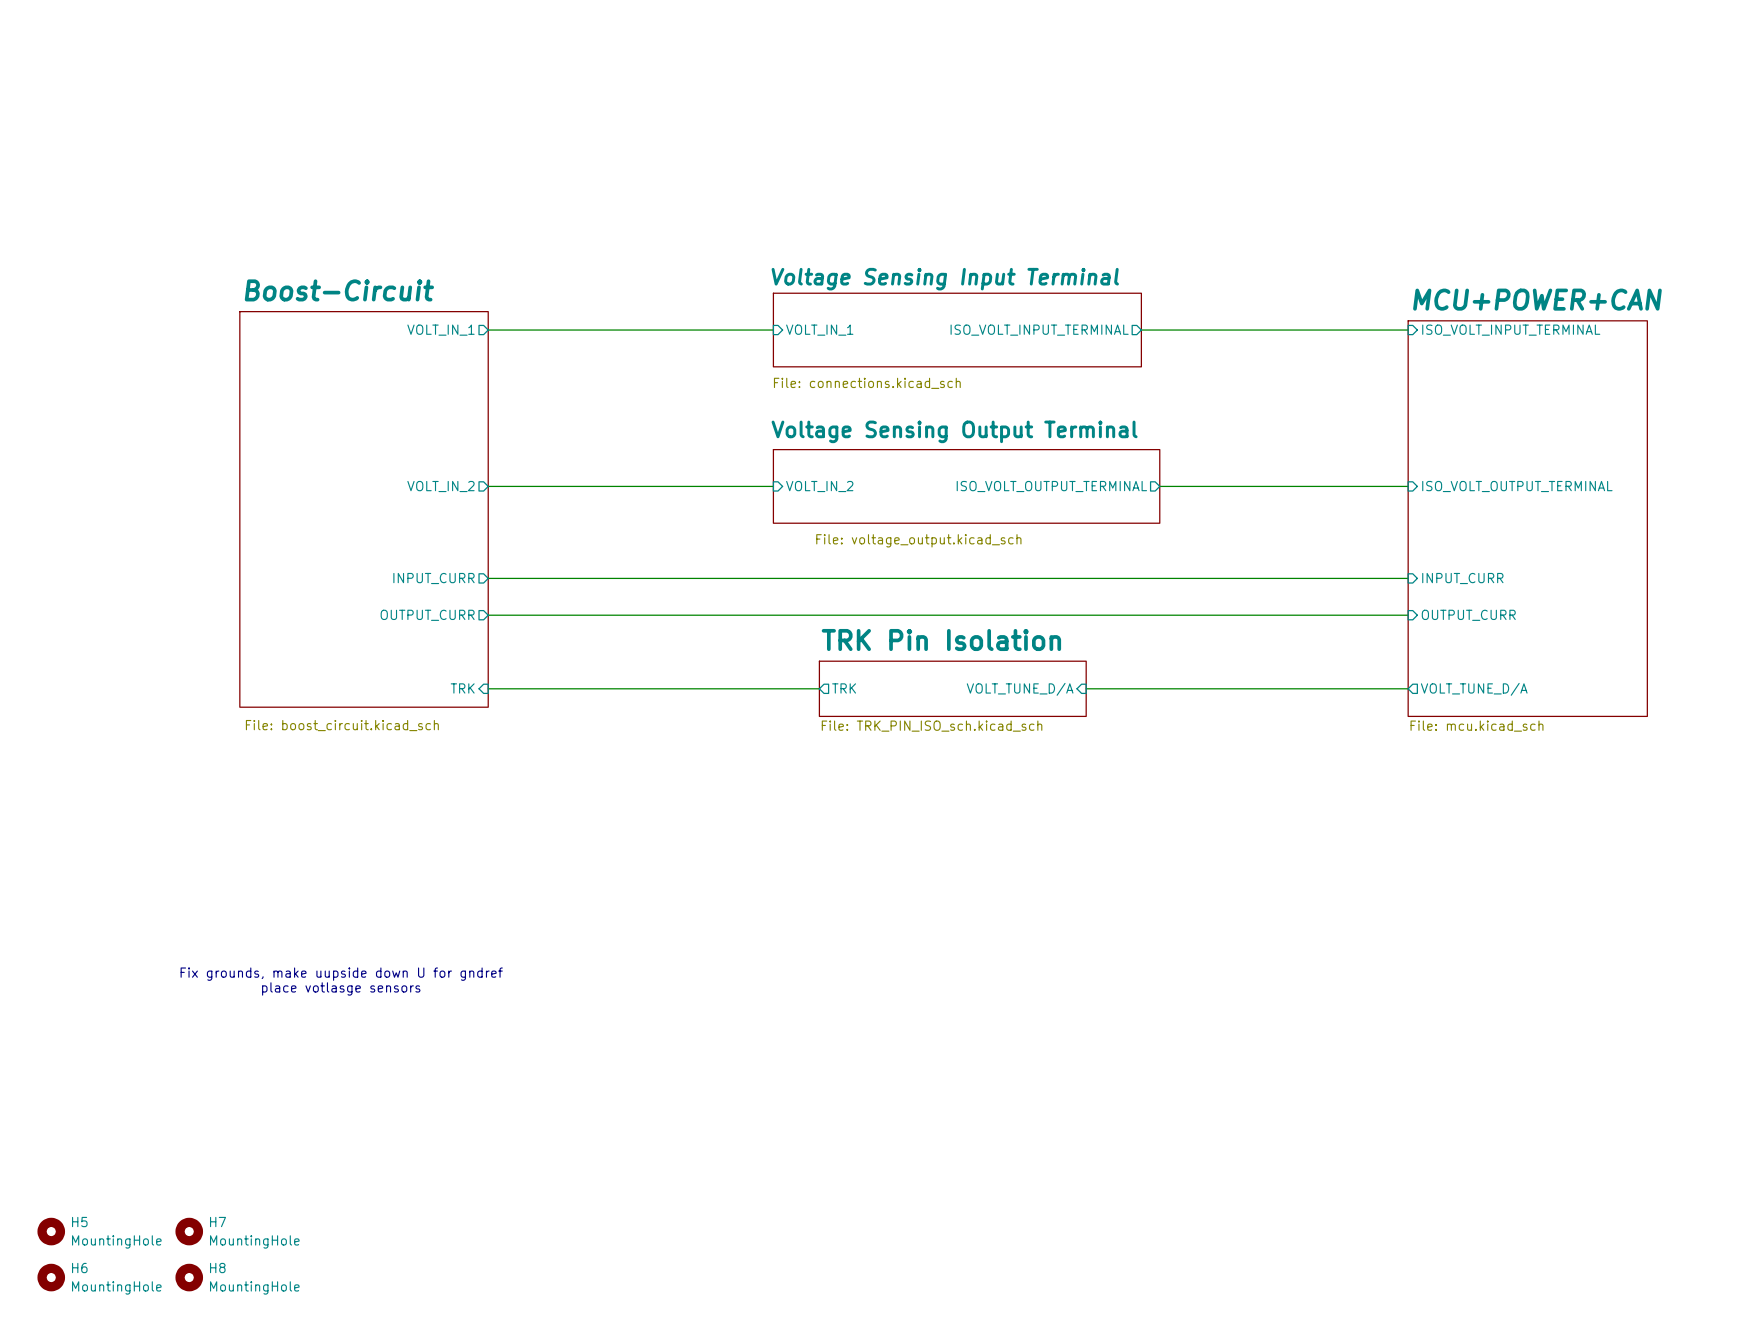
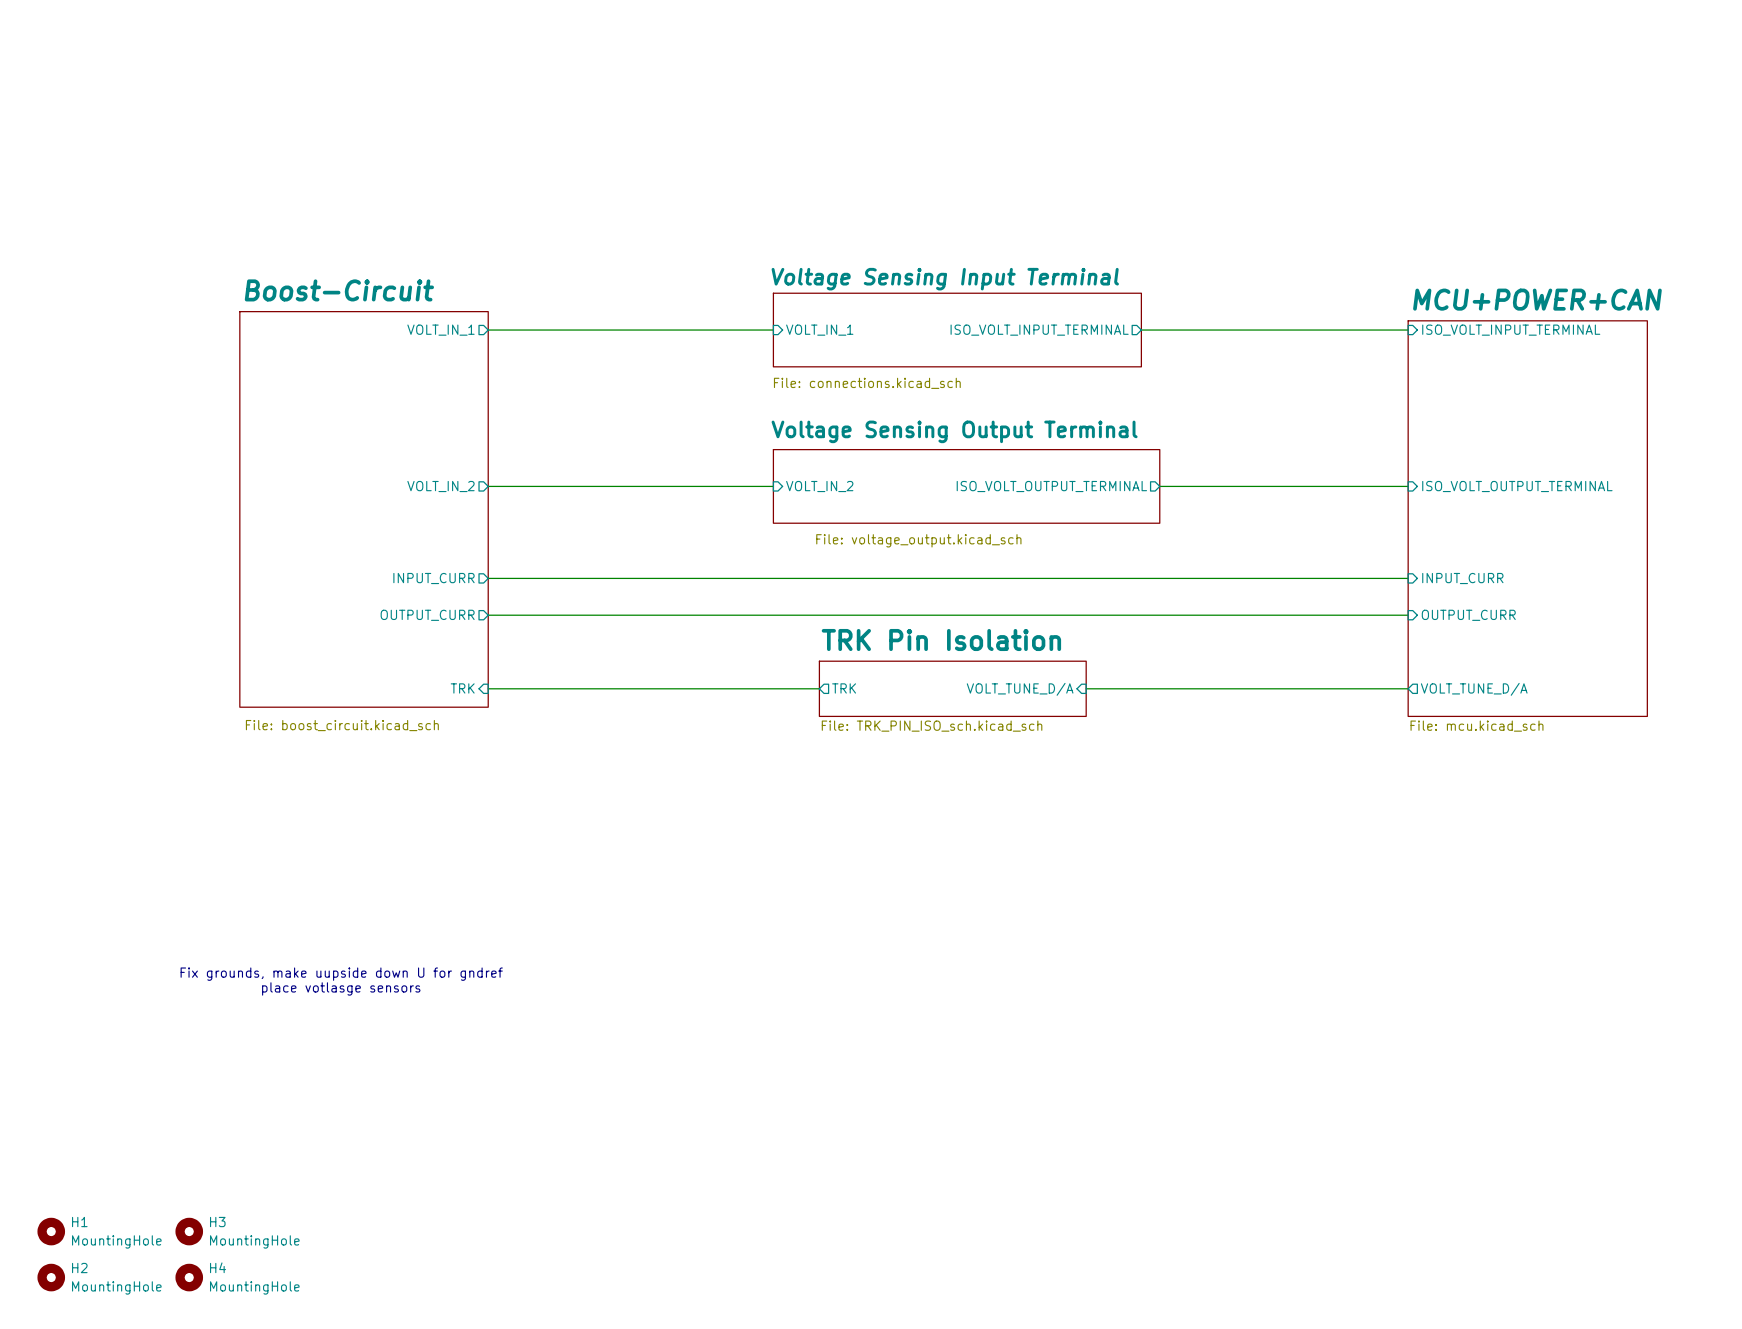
H5 name: H5 (79, 1222) -> H1 (79, 1222)
H7 name: H7 (218, 1222) -> H3 (217, 1222)
H6 name: H6 (79, 1268) -> H2 (79, 1268)
H8 name: H8 (217, 1268) -> H4 (218, 1267)

